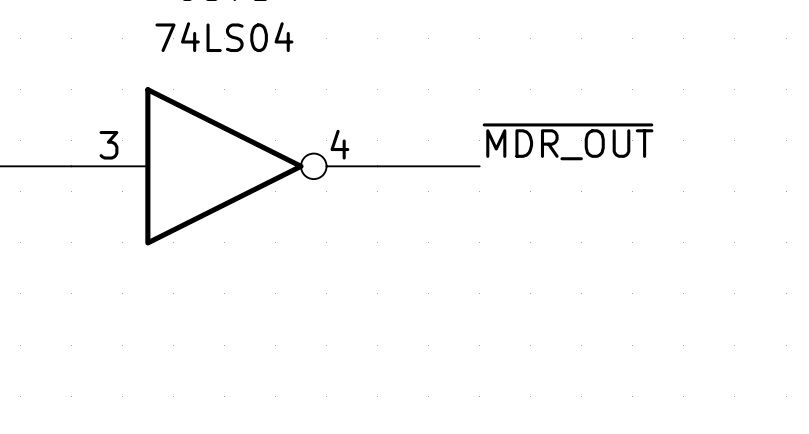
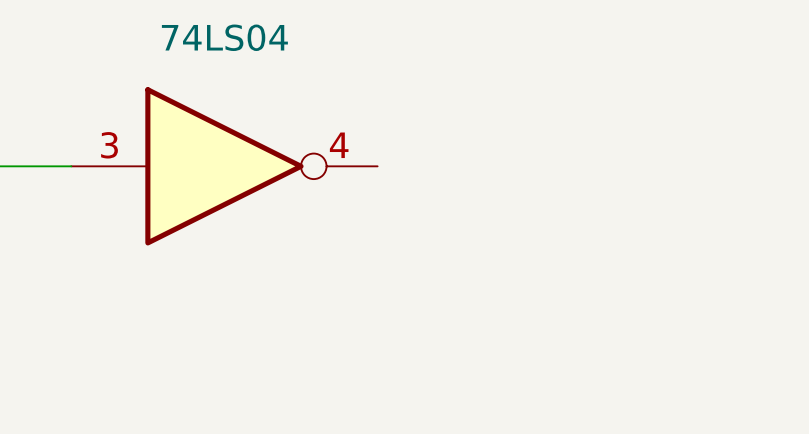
label: ~{MDR_OUT} (568, 141) -> none
wire: (377, 166) (479, 166) -> none

